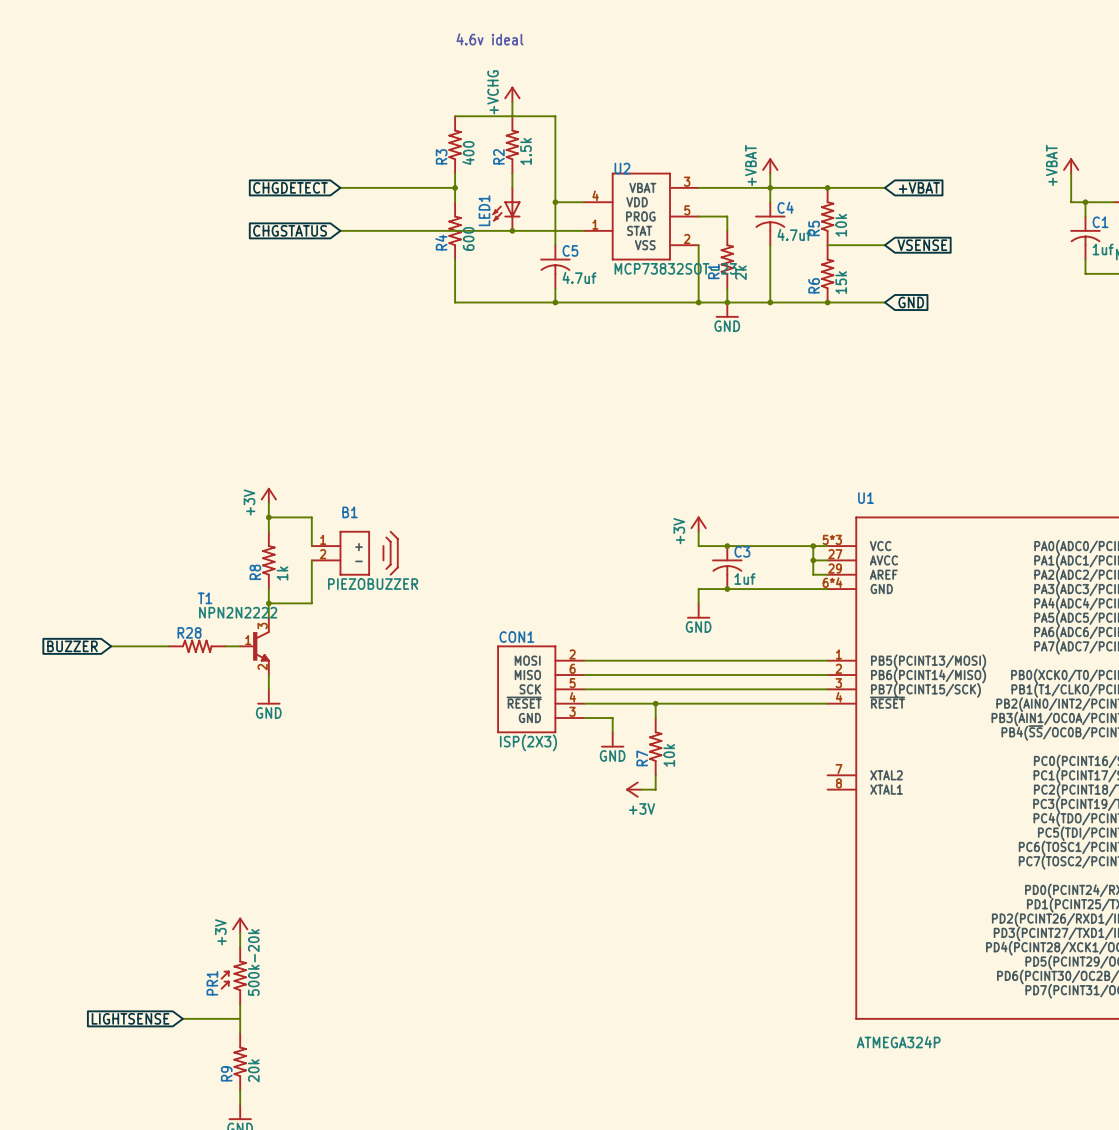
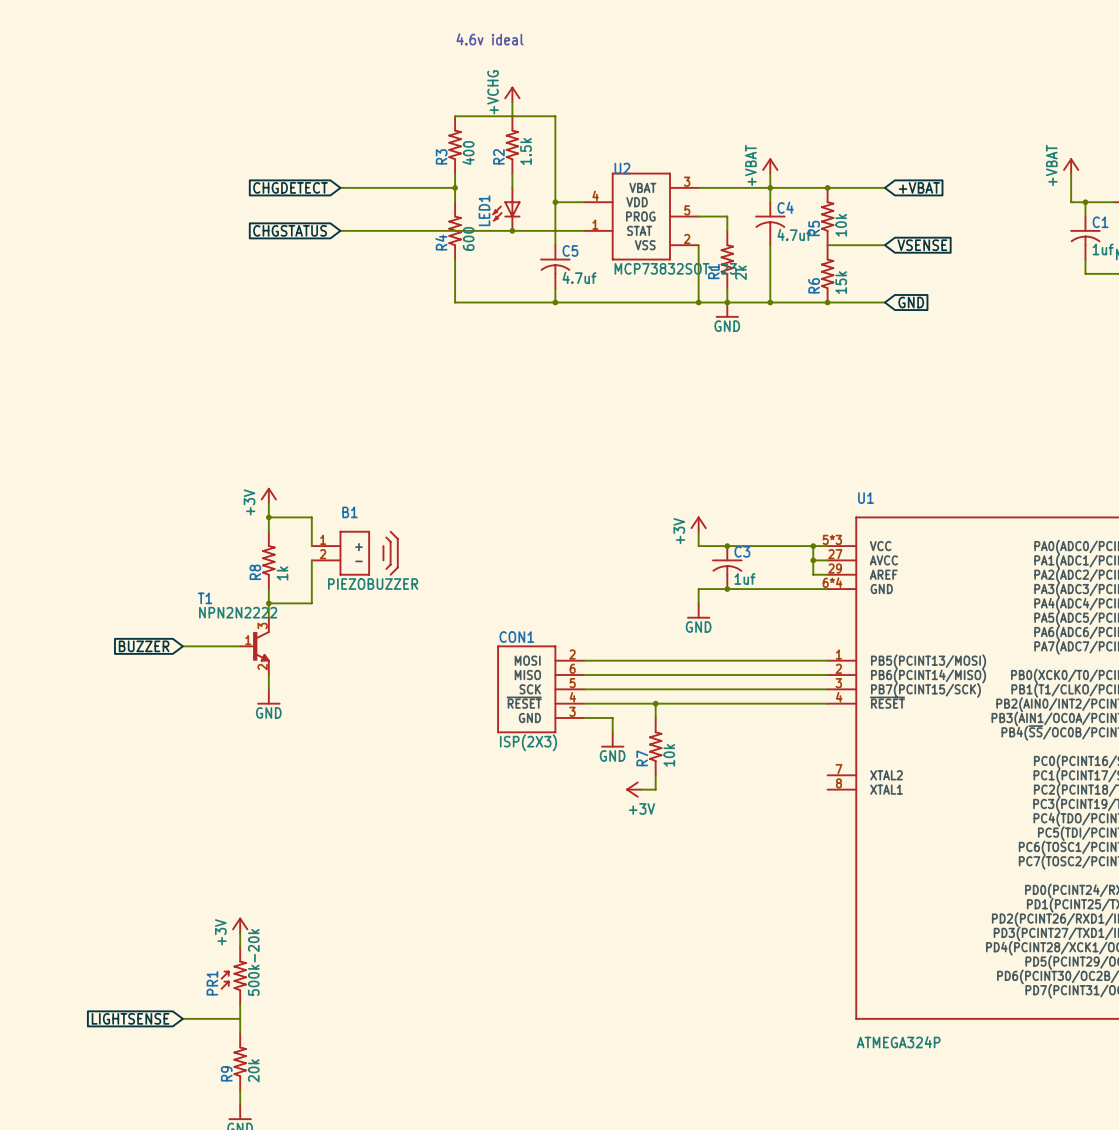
global label position: BUZZER (72, 646) -> BUZZER (144, 646)
wire: (111, 646) (168, 646) -> none
R28: (197, 646) -> none

